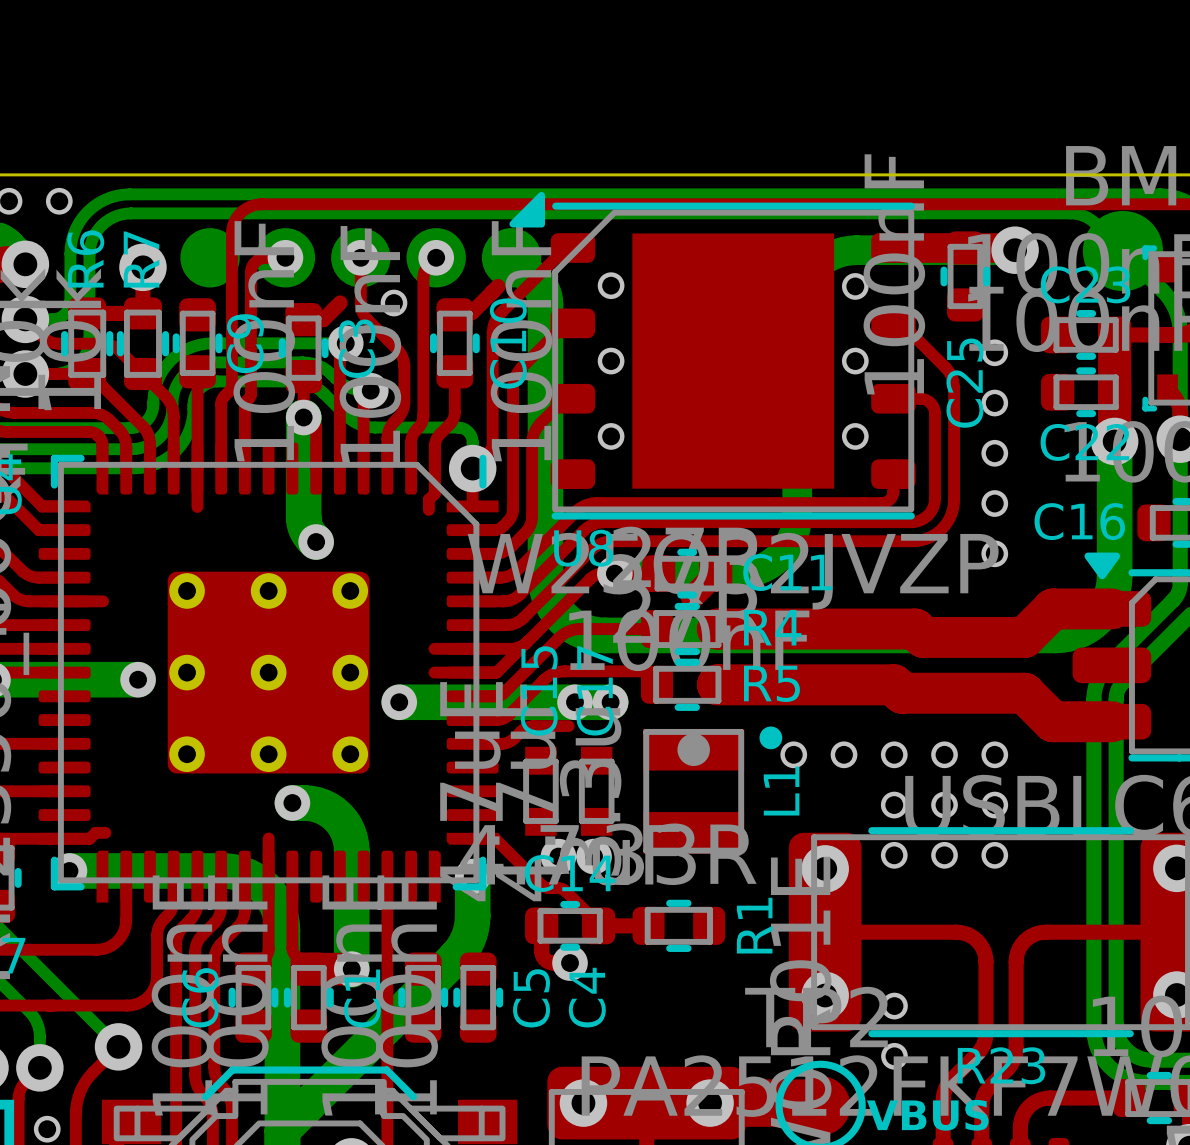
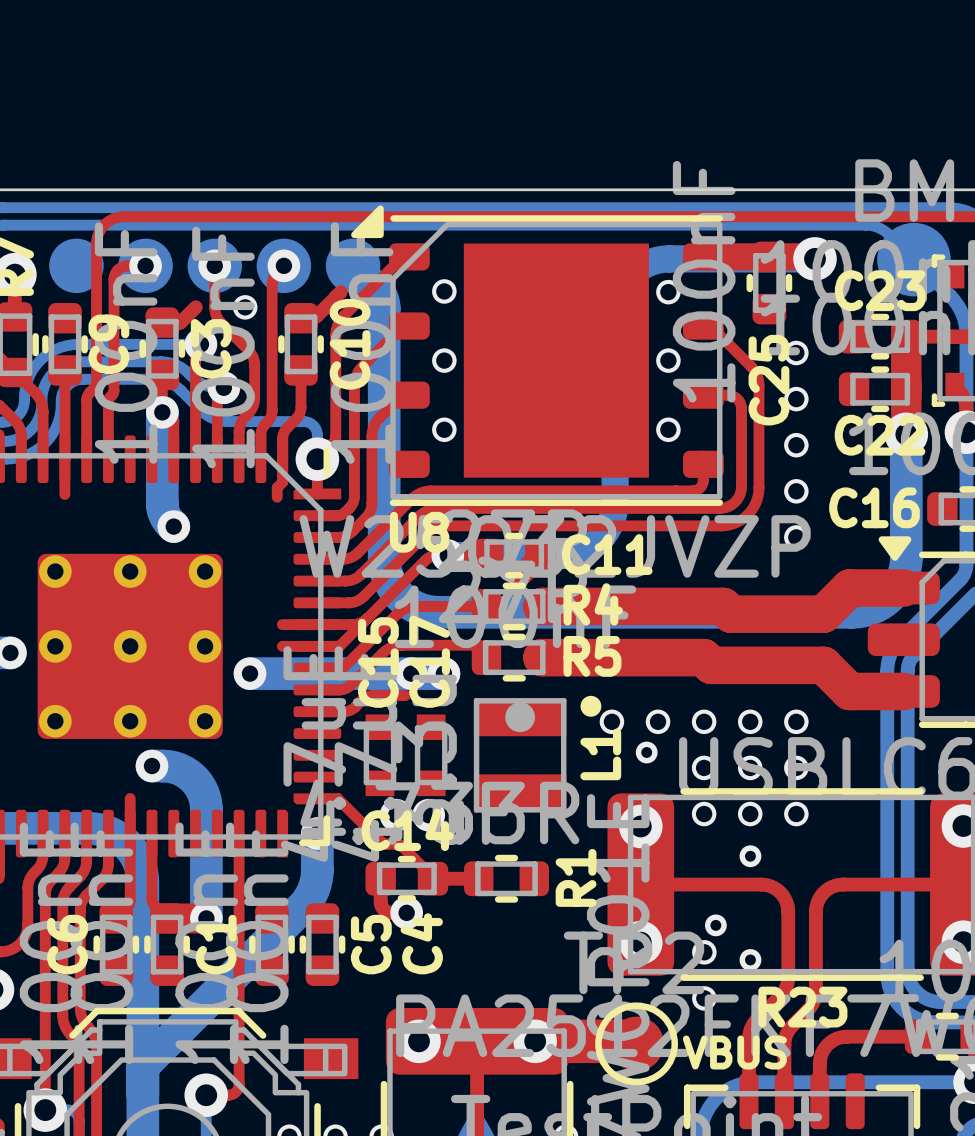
via: none -> (646, 752)
via: none -> (750, 856)
via: none -> (715, 925)
via: none -> (750, 959)

